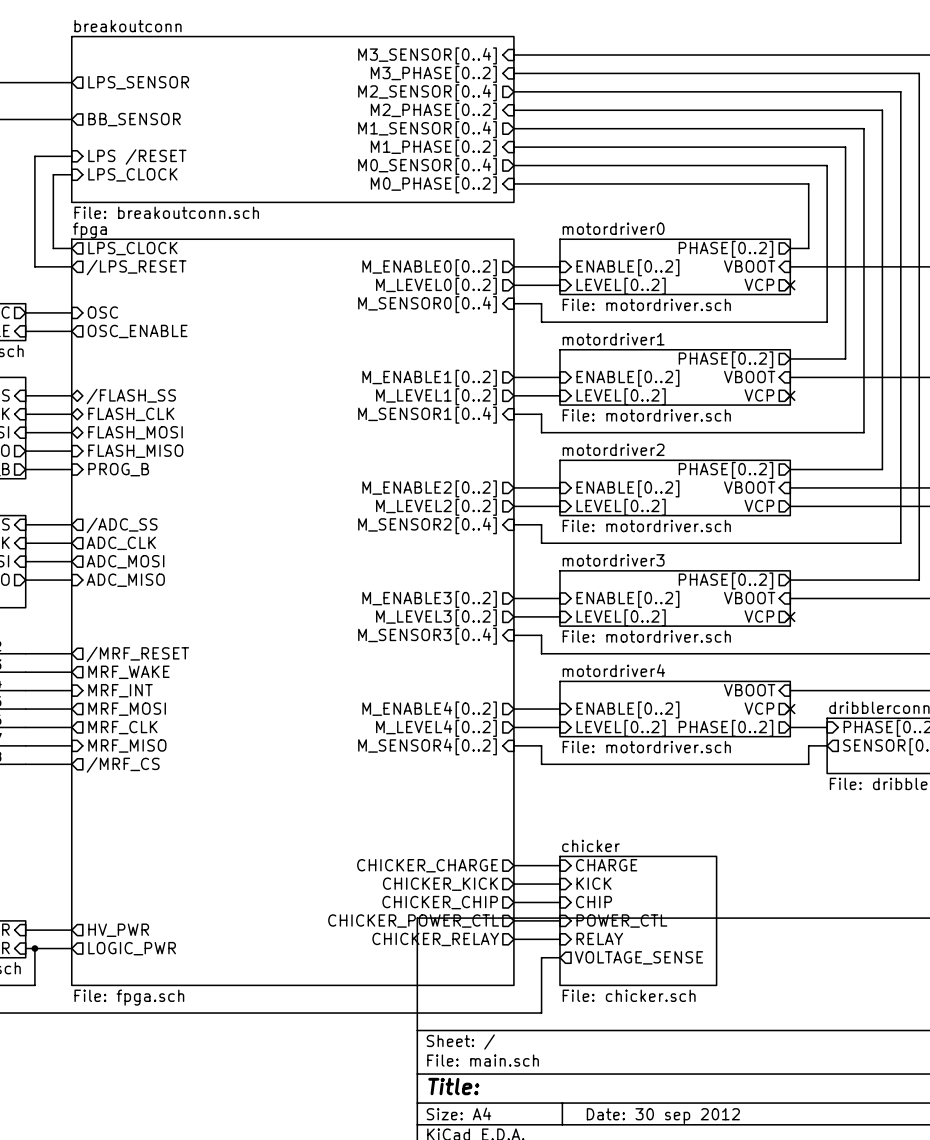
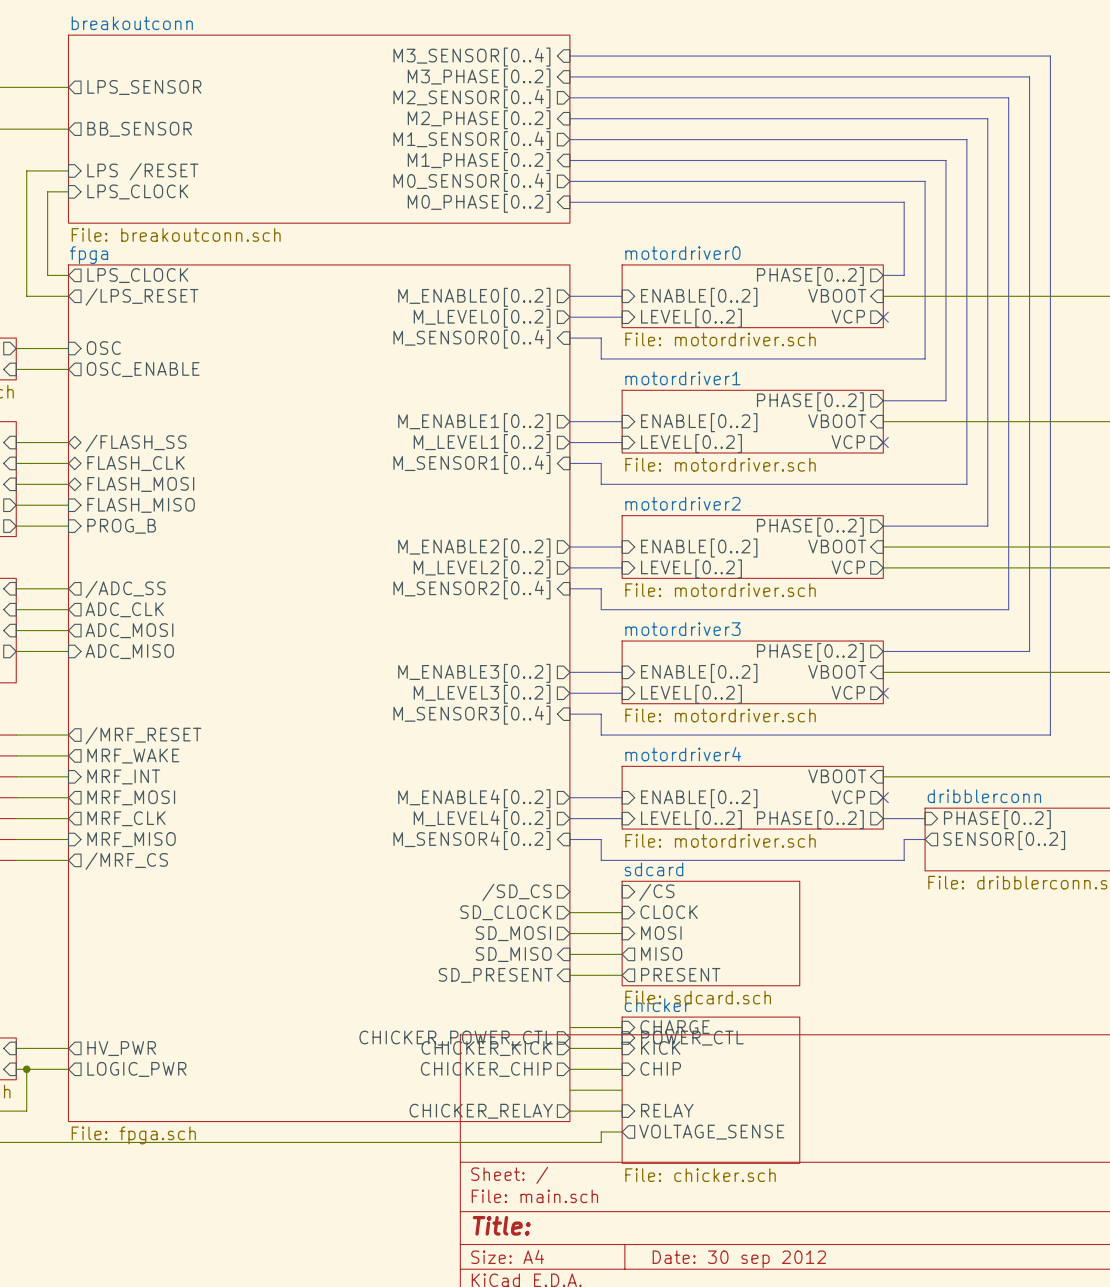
sheet fpga shape: [71, 239, 514, 986] -> [68, 264, 570, 1122]
sheet pin: none -> /SD_CS (517, 892)
sheet pin: none -> /CS (656, 892)
sheet pin: none -> CLOCK (669, 912)
sheet pin: none -> SD_CLOCK (505, 912)
wire: none -> (569, 912) (622, 912)
sheet pin: none -> SD_MOSI (513, 933)
wire: none -> (569, 933) (622, 933)
sheet pin: none -> MOSI (661, 933)
sheet sdcard: none -> File: sdcard.sch (710, 933)
sheet pin: none -> MISO (661, 953)
sheet pin: none -> SD_MISO (513, 954)
wire: none -> (569, 954) (622, 954)
sheet pin shape: output (427, 865) -> input (495, 975)
sheet pin: CHICKER_CHARGE (427, 865) -> SD_PRESENT (495, 975)
sheet pin shape: input (606, 865) -> output (680, 974)
sheet pin: CHARGE (606, 865) -> PRESENT (680, 974)
sheet pin position: KICK (594, 883) -> KICK (660, 1047)
sheet pin position: CHICKER_KICK (440, 884) -> CHICKER_KICK (486, 1048)
wire: (513, 884) (559, 884) -> (569, 1027) (622, 1027)
sheet pin position: CHICKER_CHIP (440, 902) -> CHICKER_CHIP (486, 1069)
wire: (513, 902) (559, 902) -> (569, 1048) (622, 1048)
sheet pin position: CHIP (594, 902) -> CHIP (660, 1068)
sheet pin: none -> CHARGE (675, 1027)
wire: (513, 920) (559, 920) -> (569, 1069) (622, 1069)
sheet chicker position: (638, 920) -> (710, 1090)
sheet pin position: RELAY (599, 938) -> RELAY (667, 1110)
sheet pin position: CHICKER_RELAY (435, 939) -> CHICKER_RELAY (481, 1111)
wire: (513, 939) (559, 939) -> (569, 1090) (622, 1090)
wire: (559, 957) (541, 957) (541, 1003) -> (622, 1131) (601, 1131)
sheet pin position: VOLTAGE_SENSE (639, 957) -> VOLTAGE_SENSE (711, 1132)
wire: none -> (569, 1111) (622, 1111)

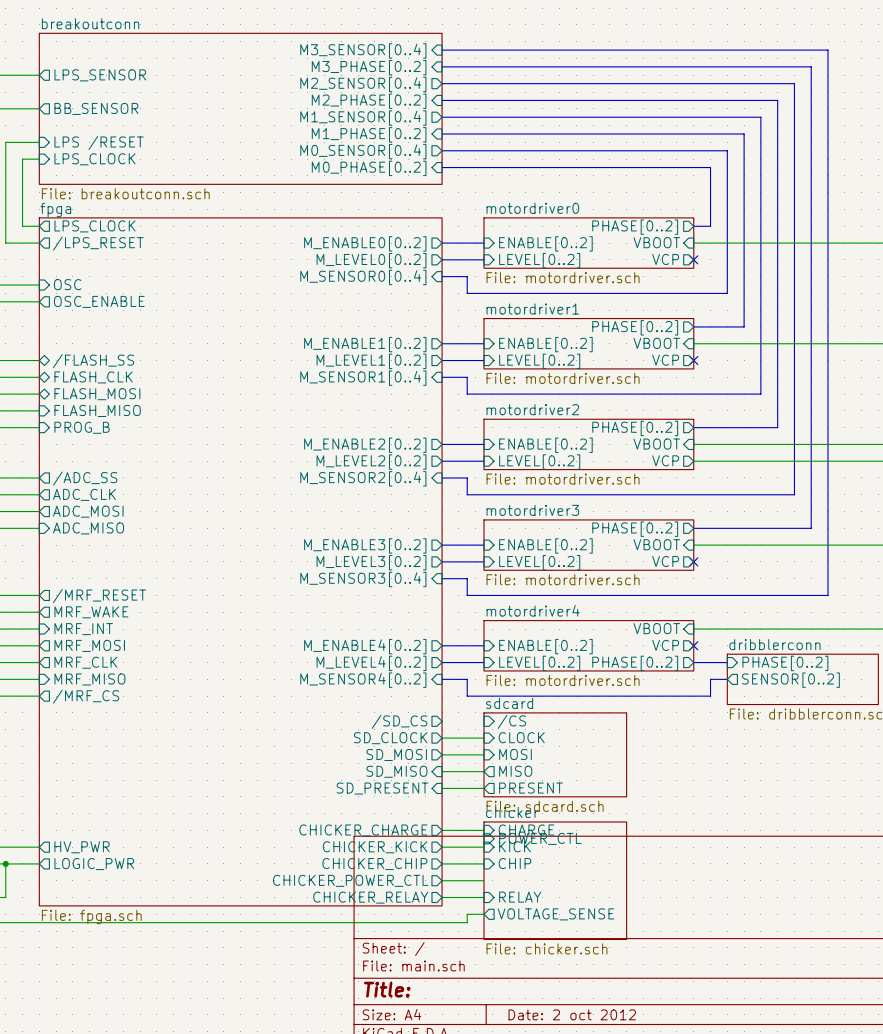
sheet pin: none -> CHICKER_CHARGE (363, 830)
sheet pin position: CHICKER_POWER_CTL (456, 1038) -> CHICKER_POWER_CTL (350, 880)
title block: Date: 30 sep 2012 (739, 1259) -> Date: 2 oct 2012 (572, 1014)

